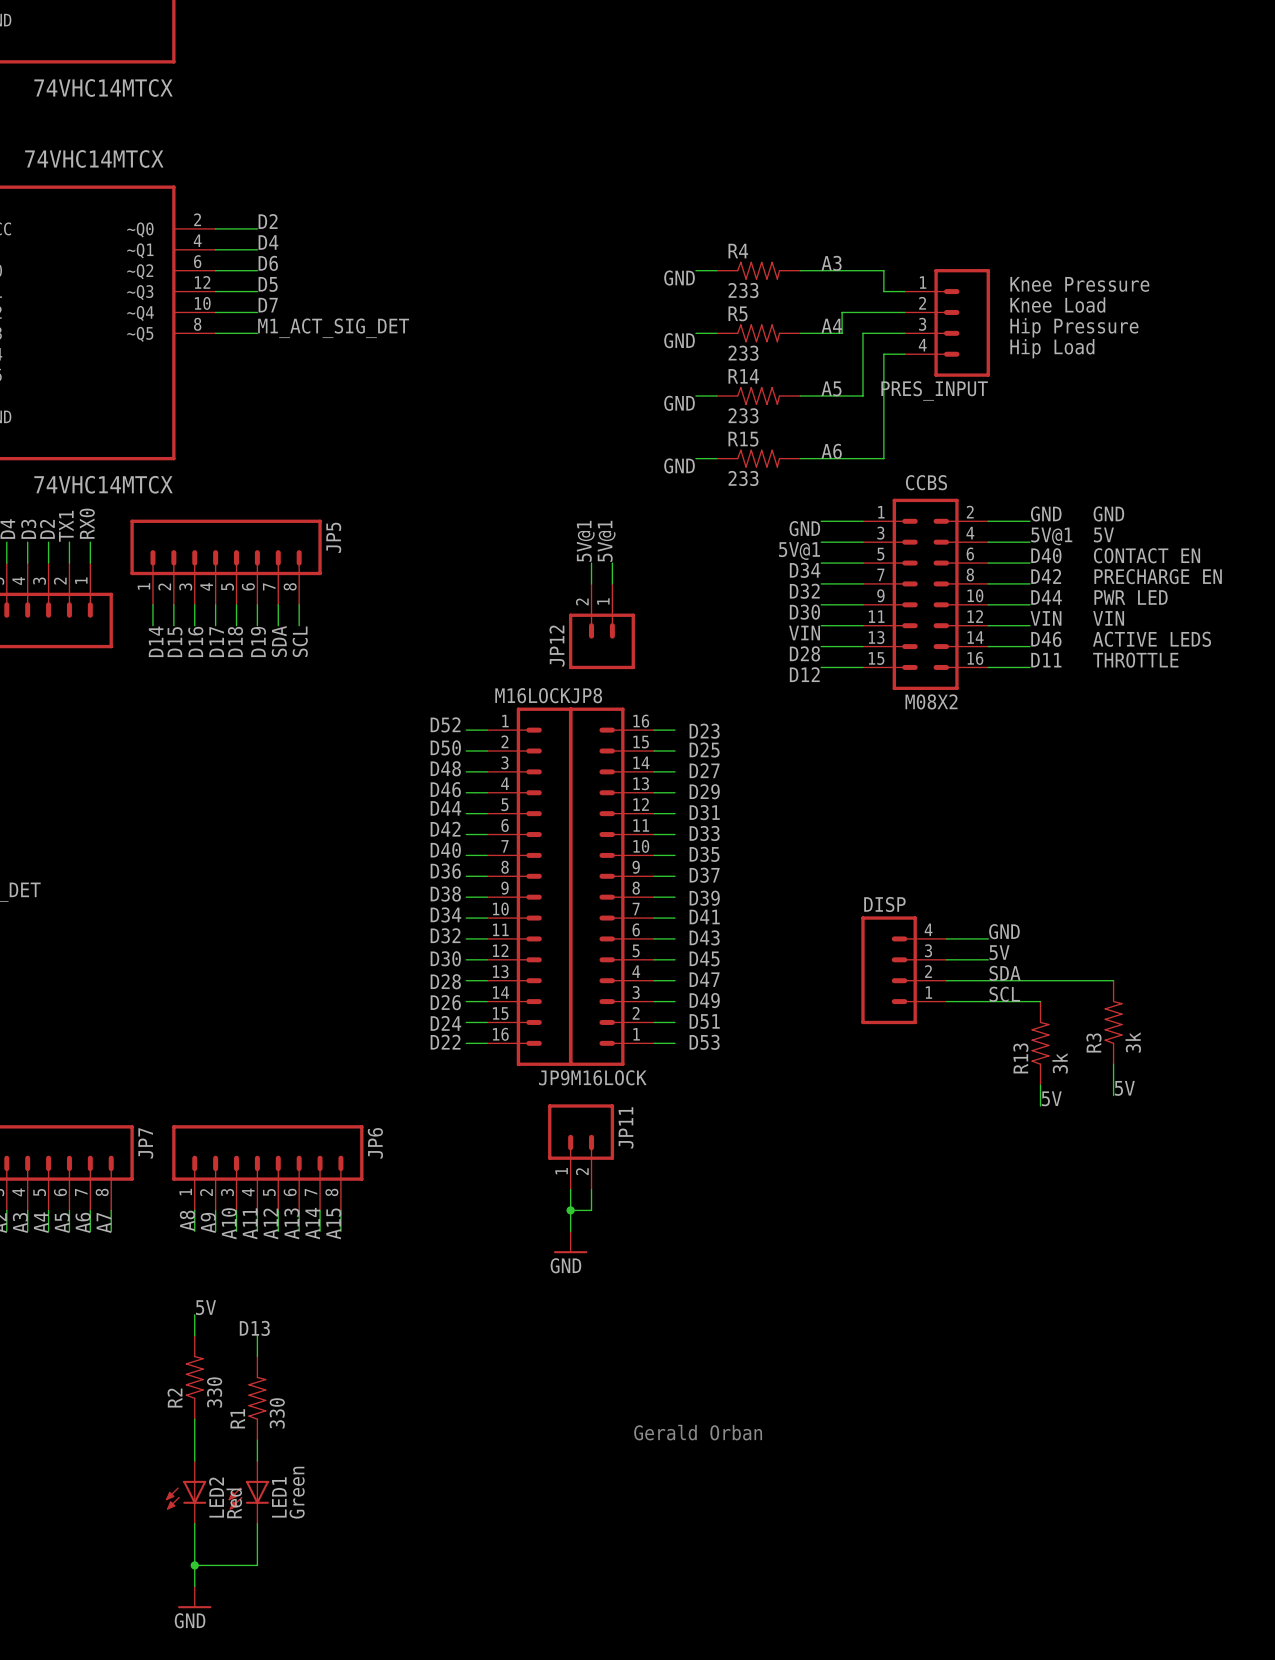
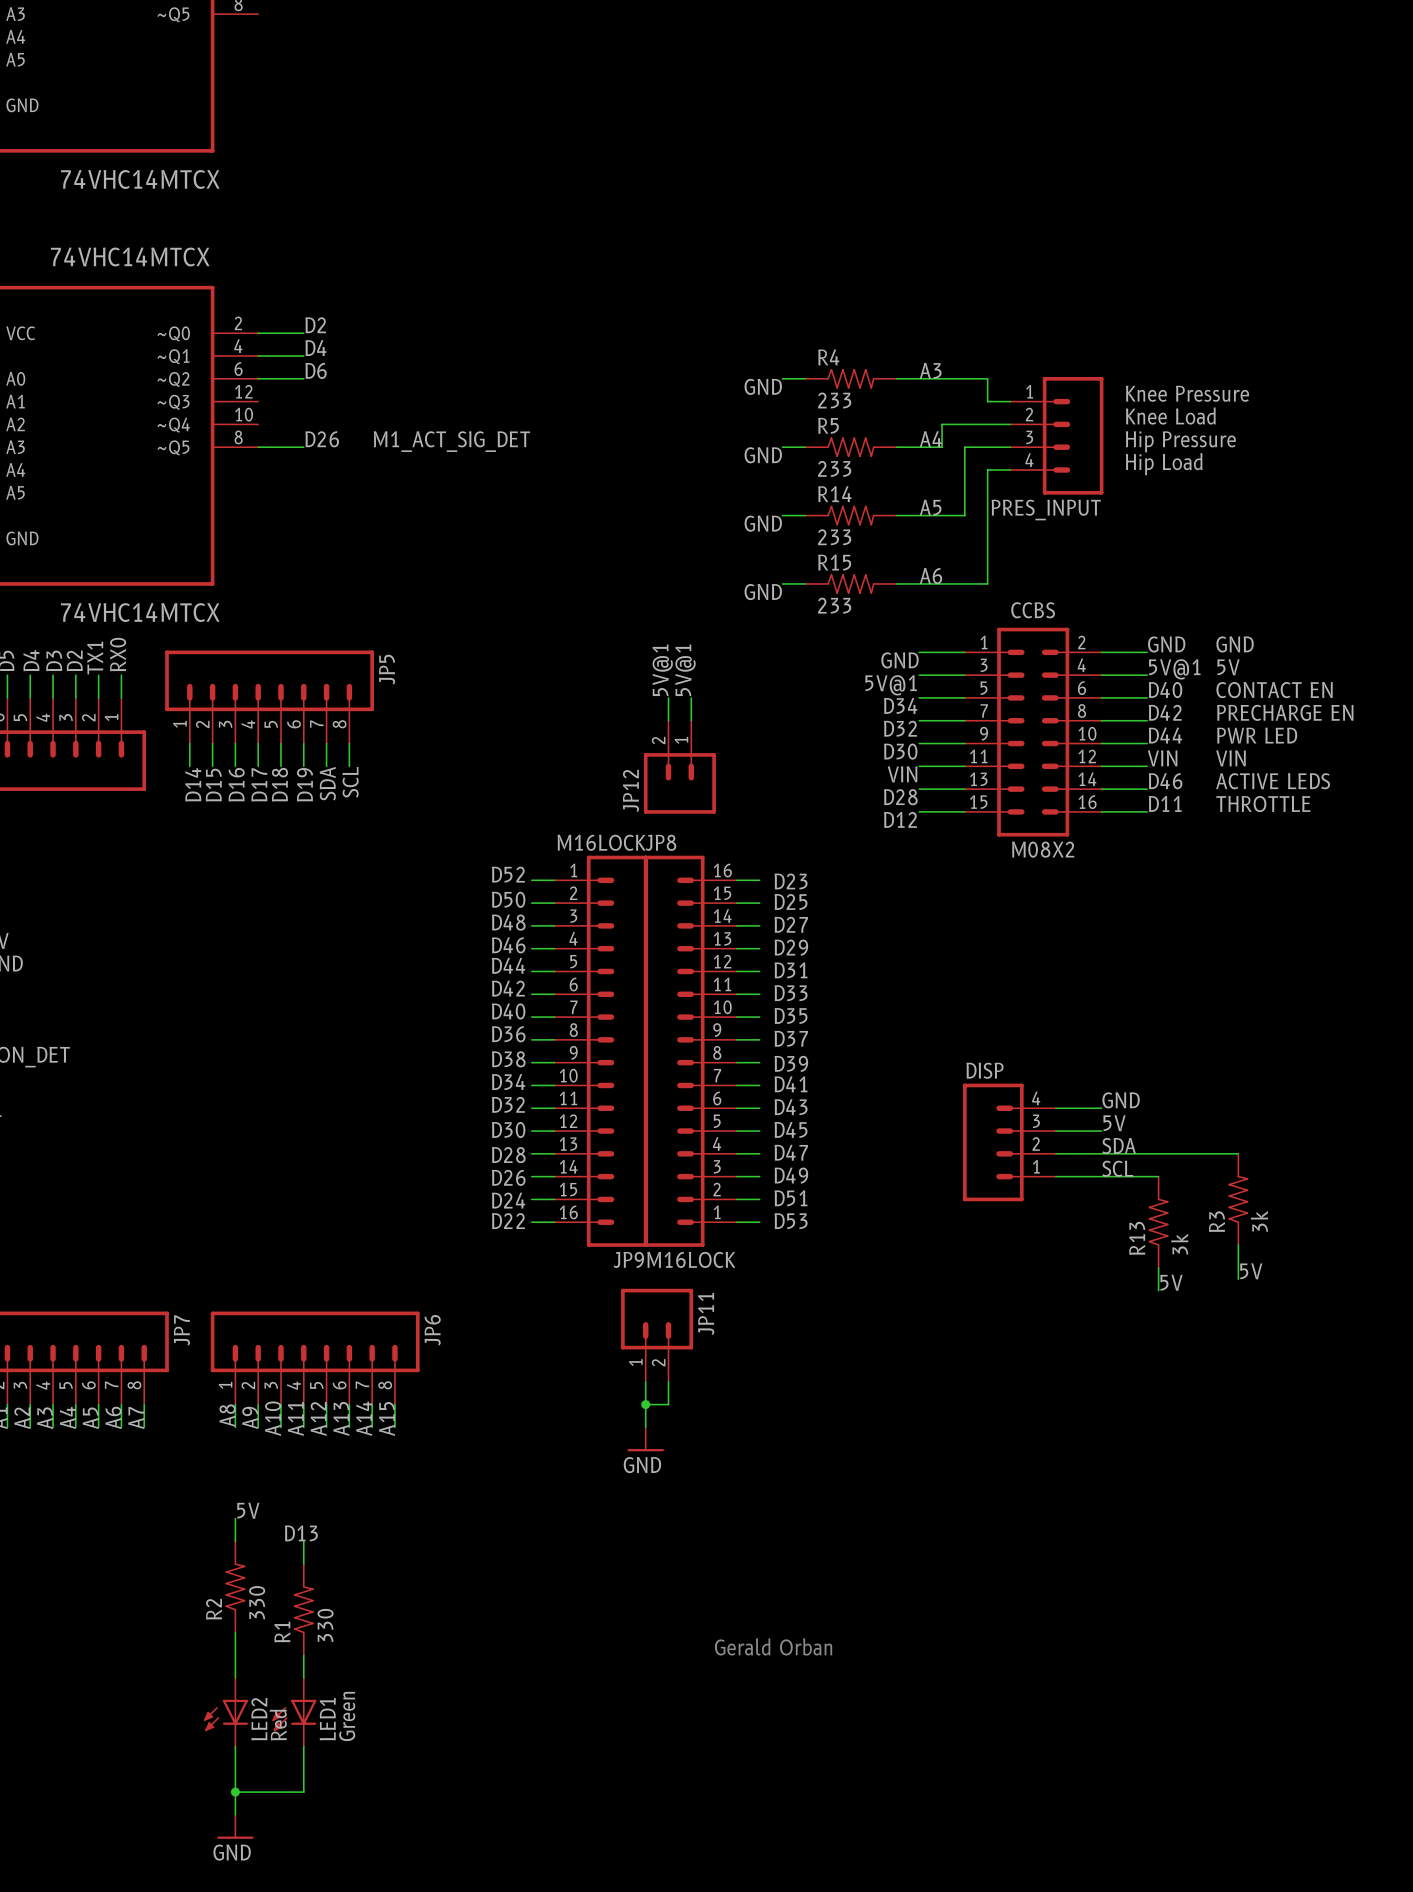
label: D5 (268, 284) -> none
wire: (215, 291) (257, 291) -> none
label: D7 (268, 305) -> none
wire: (215, 312) (257, 312) -> none
label: M1_ACT_SIG_DET (333, 328) -> D26 (322, 439)
text: none -> M1_ACT_SIG_DET (451, 441)

